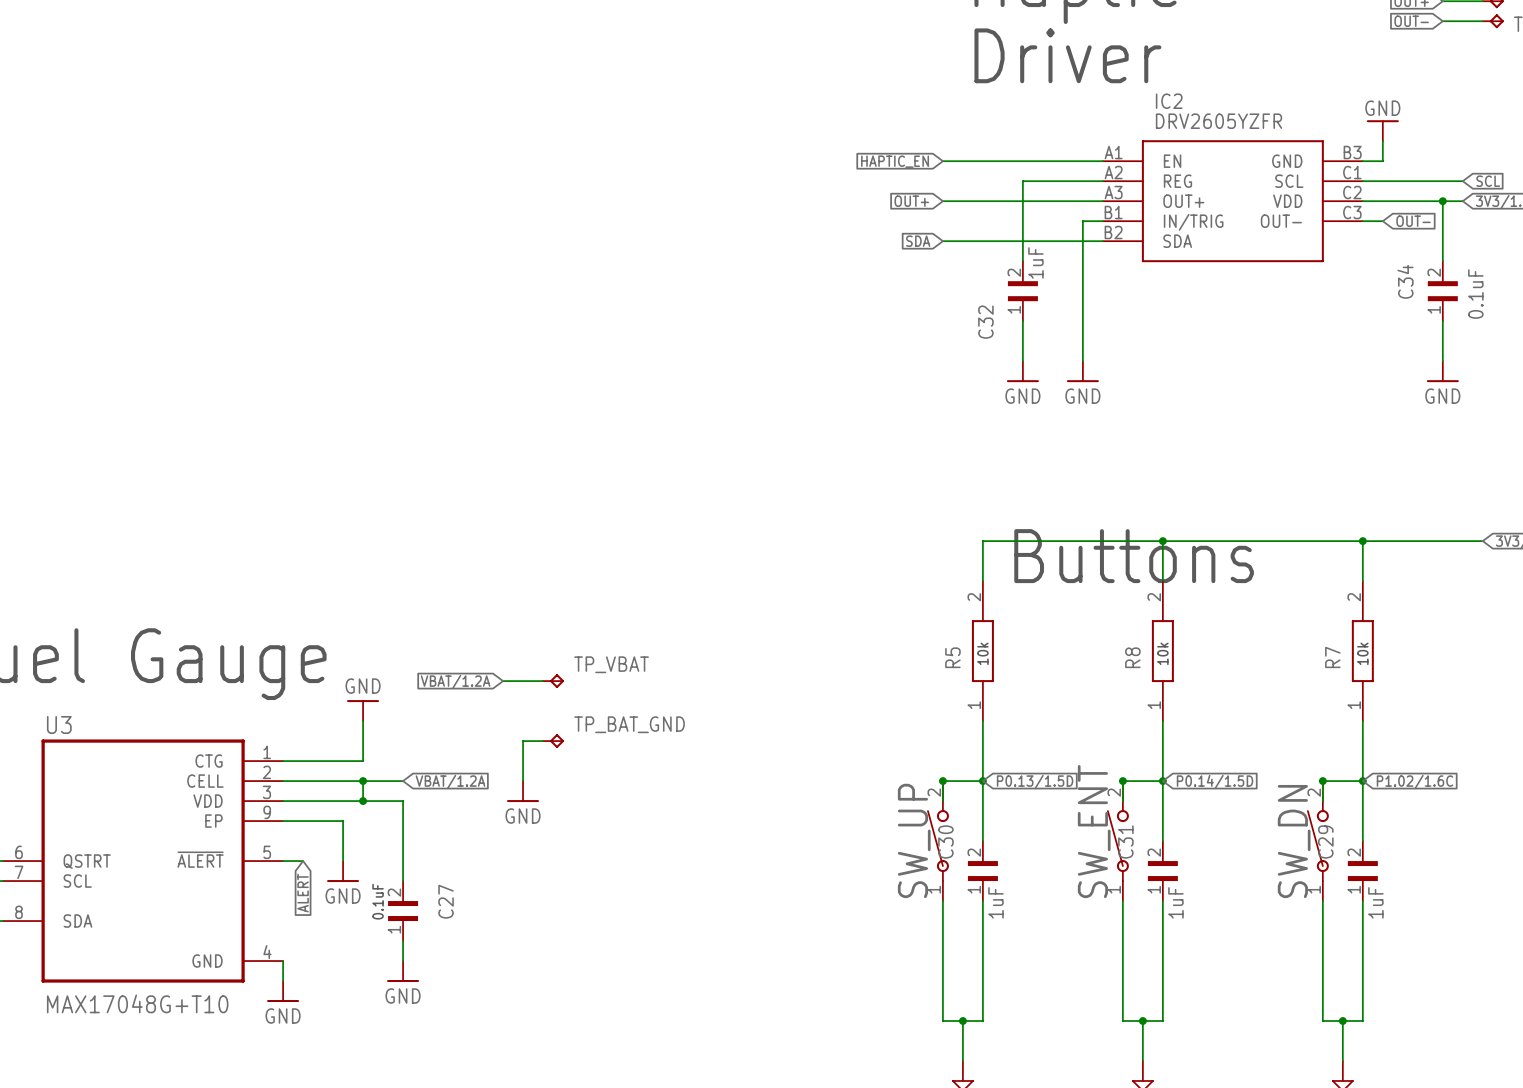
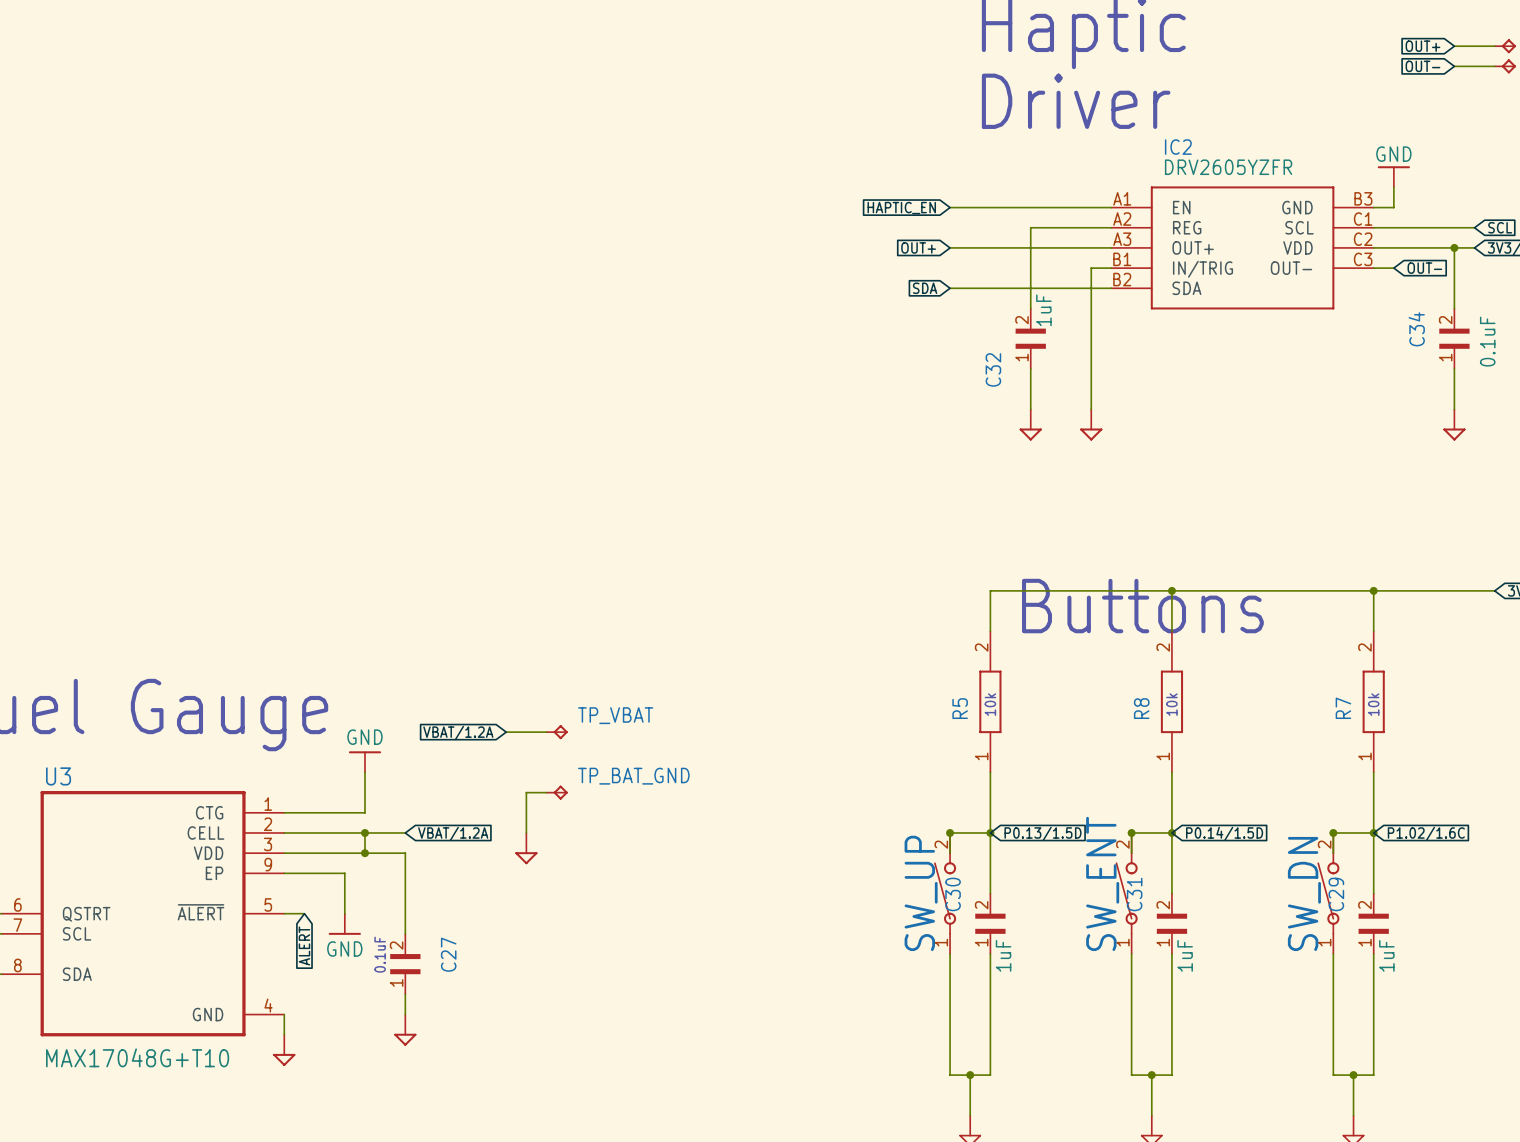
power symbol shape: [1006, 361, 1039, 383] -> [1019, 409, 1042, 441]
power symbol shape: [1066, 361, 1099, 383] -> [1080, 409, 1103, 441]
power symbol shape: [1426, 361, 1459, 383] -> [1443, 409, 1466, 441]
power symbol text: GND (1022, 396) -> none
power symbol text: GND (1082, 396) -> none
power symbol text: GND (1442, 396) -> none
power symbol shape: [507, 781, 540, 803] -> [515, 832, 538, 865]
power symbol text: GND (523, 816) -> none
power symbol shape: [387, 961, 420, 983] -> [394, 1014, 417, 1046]
power symbol shape: [267, 981, 300, 1003] -> [273, 1034, 296, 1067]
power symbol text: GND (403, 996) -> none
power symbol text: GND (283, 1016) -> none

